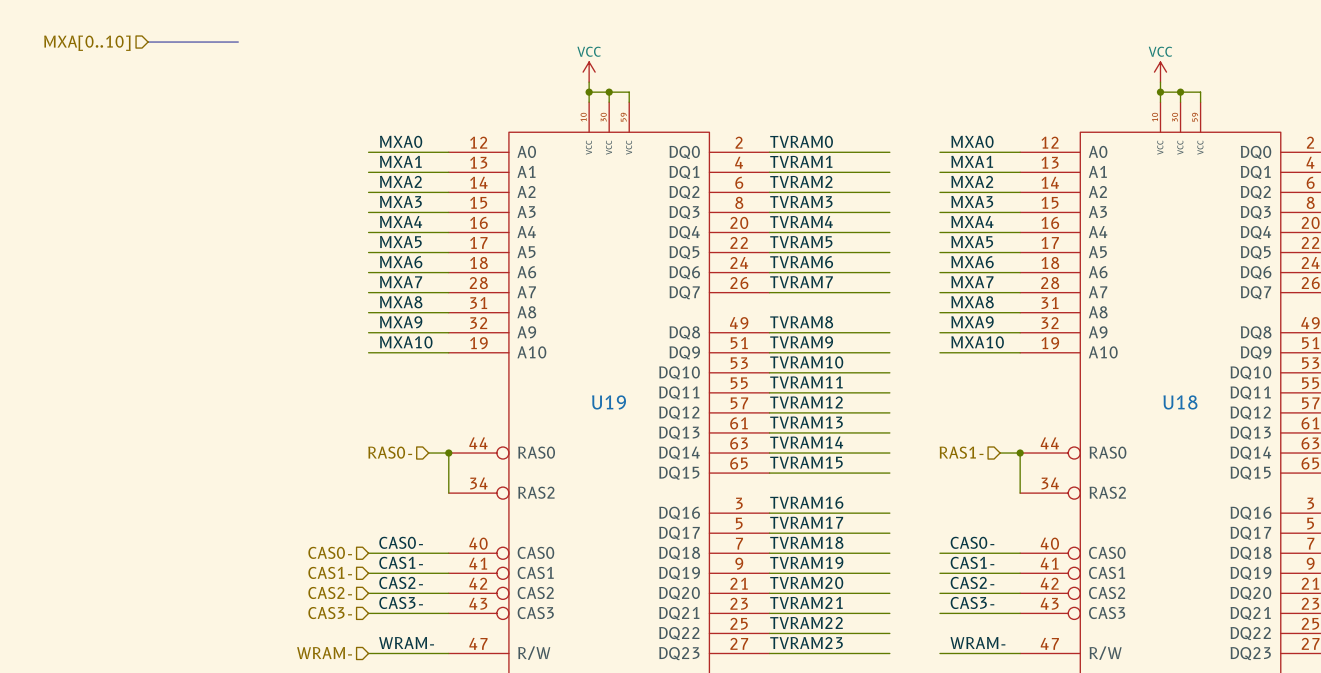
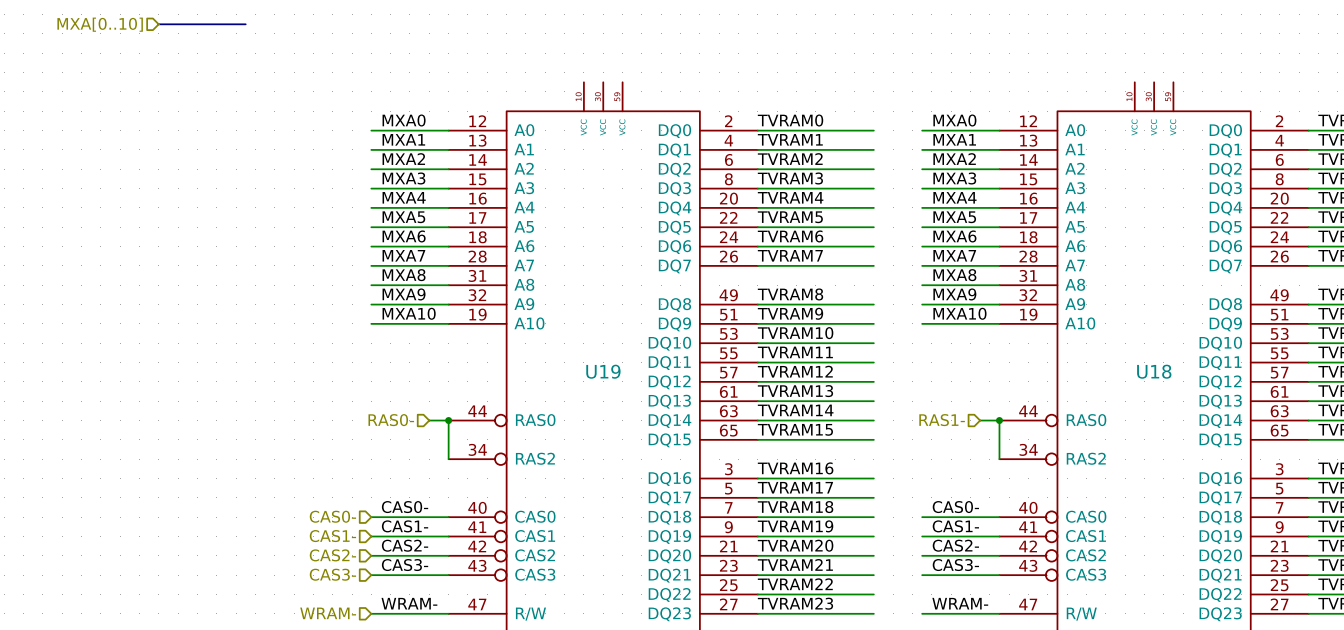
power symbol: VCC (589, 72) -> none
power symbol: VCC (1160, 72) -> none
wire: (589, 82) (589, 102) -> none
wire: (1160, 82) (1160, 102) -> none
wire: (589, 92) (629, 92) (629, 102) -> none
junction: (589, 92) -> none
wire: (609, 92) (609, 102) -> none
junction: (609, 92) -> none
wire: (1160, 92) (1200, 92) (1200, 102) -> none
junction: (1160, 92) -> none
wire: (1180, 92) (1180, 102) -> none
junction: (1180, 92) -> none

